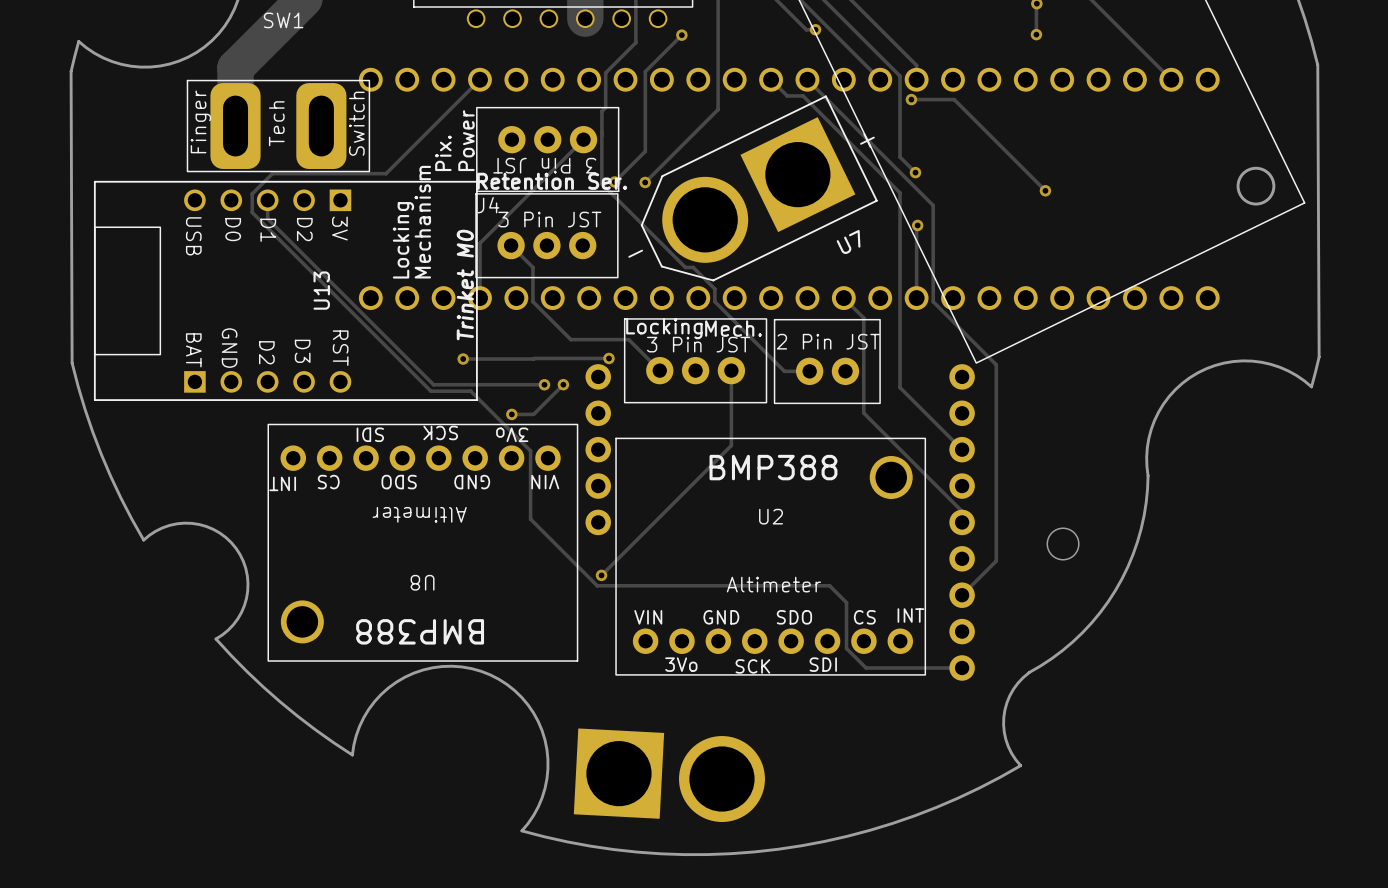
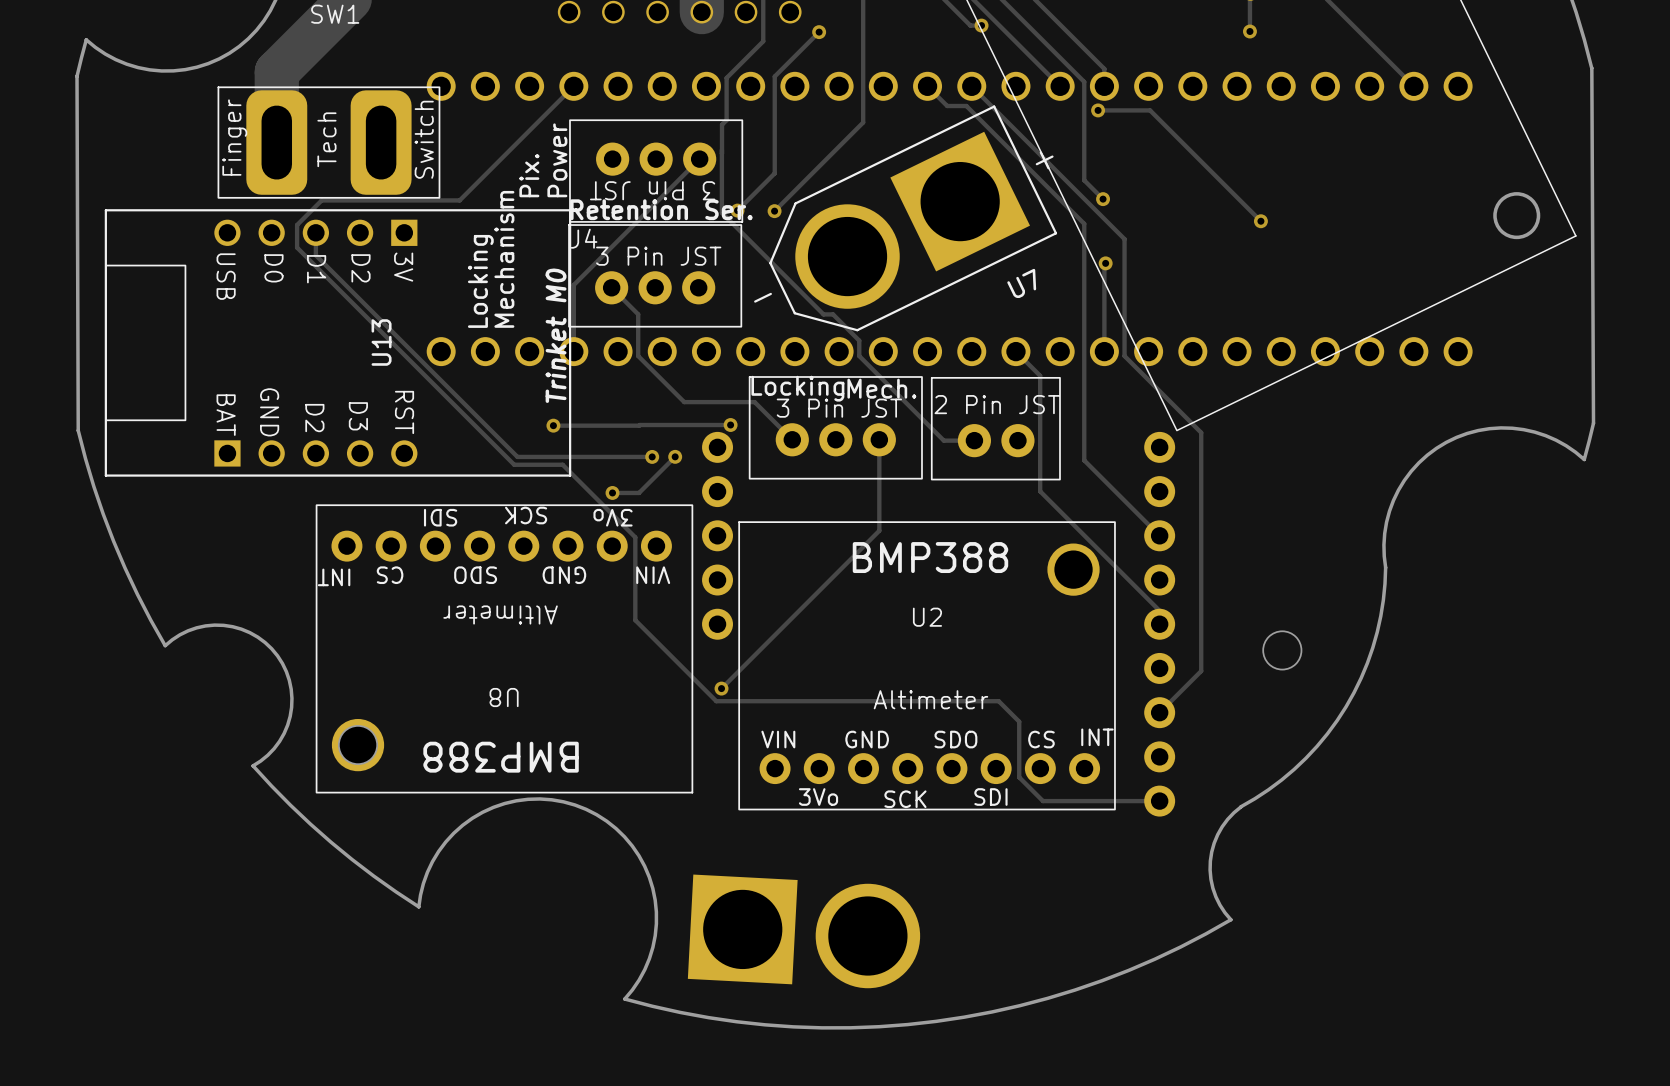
round board edge: none -> [338, 725, 379, 766]

